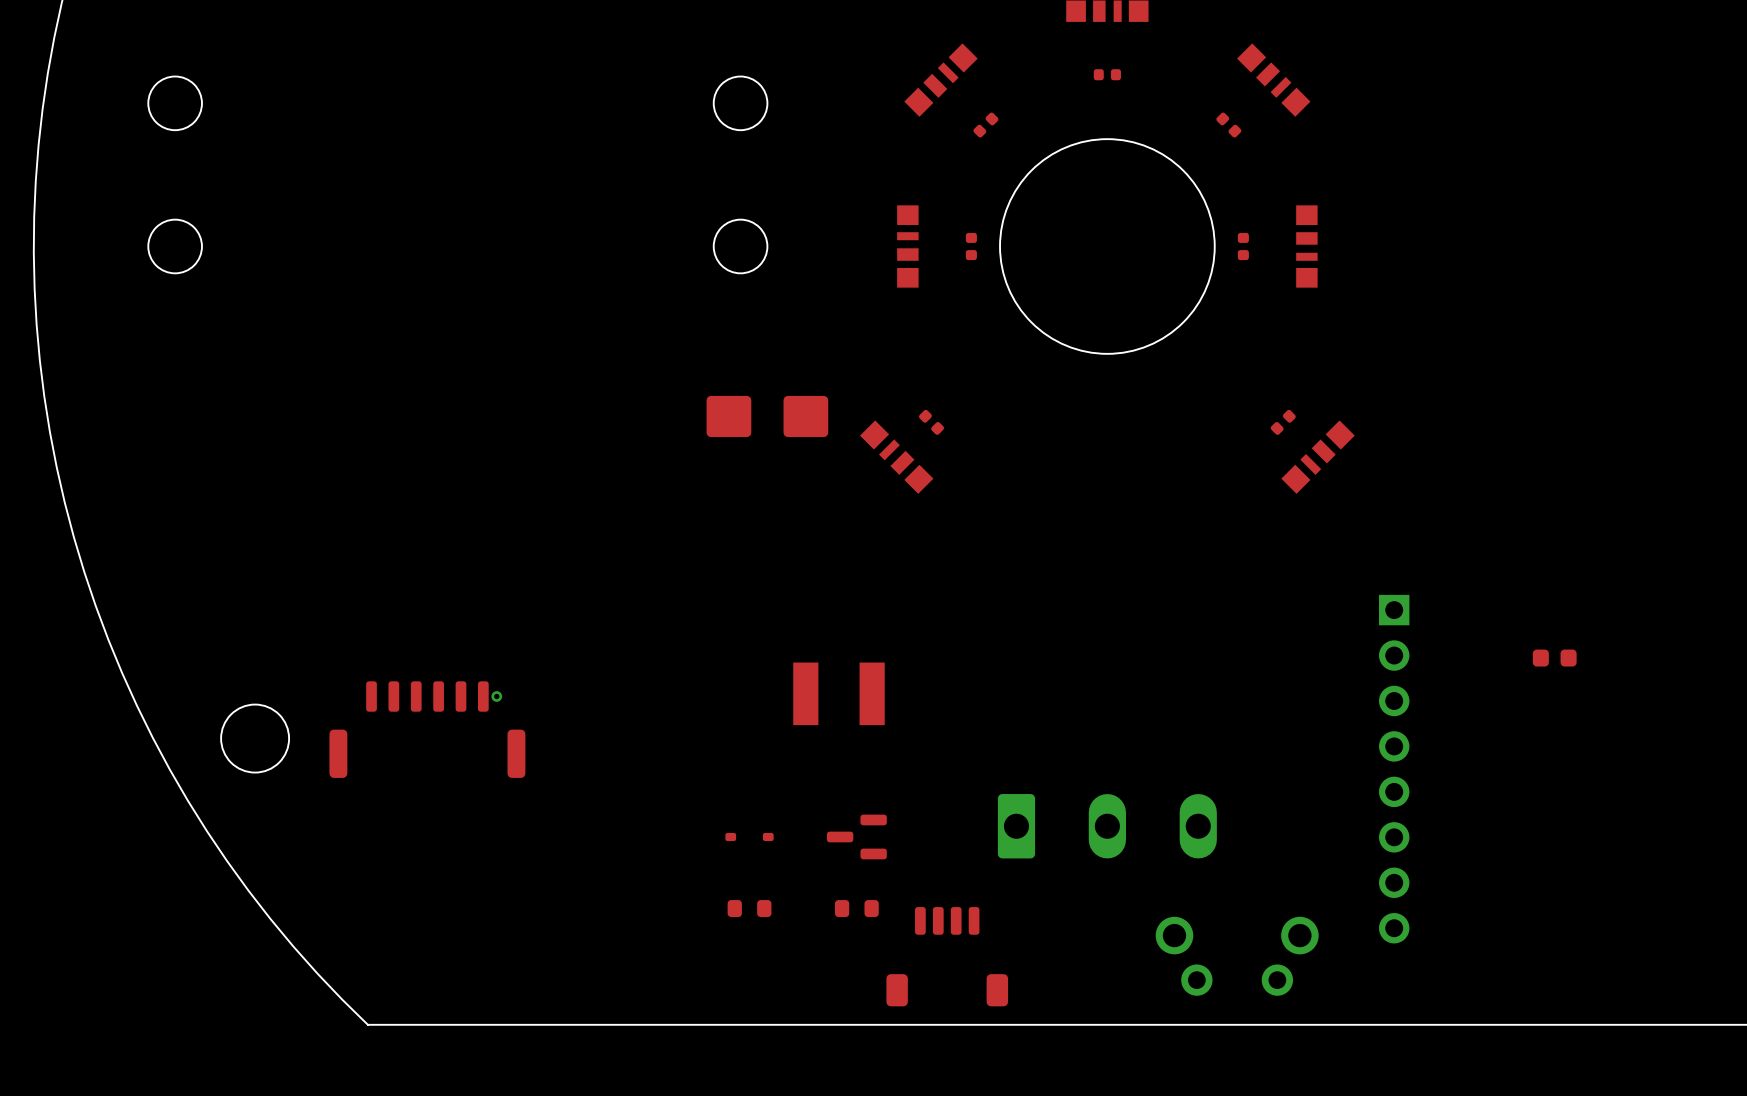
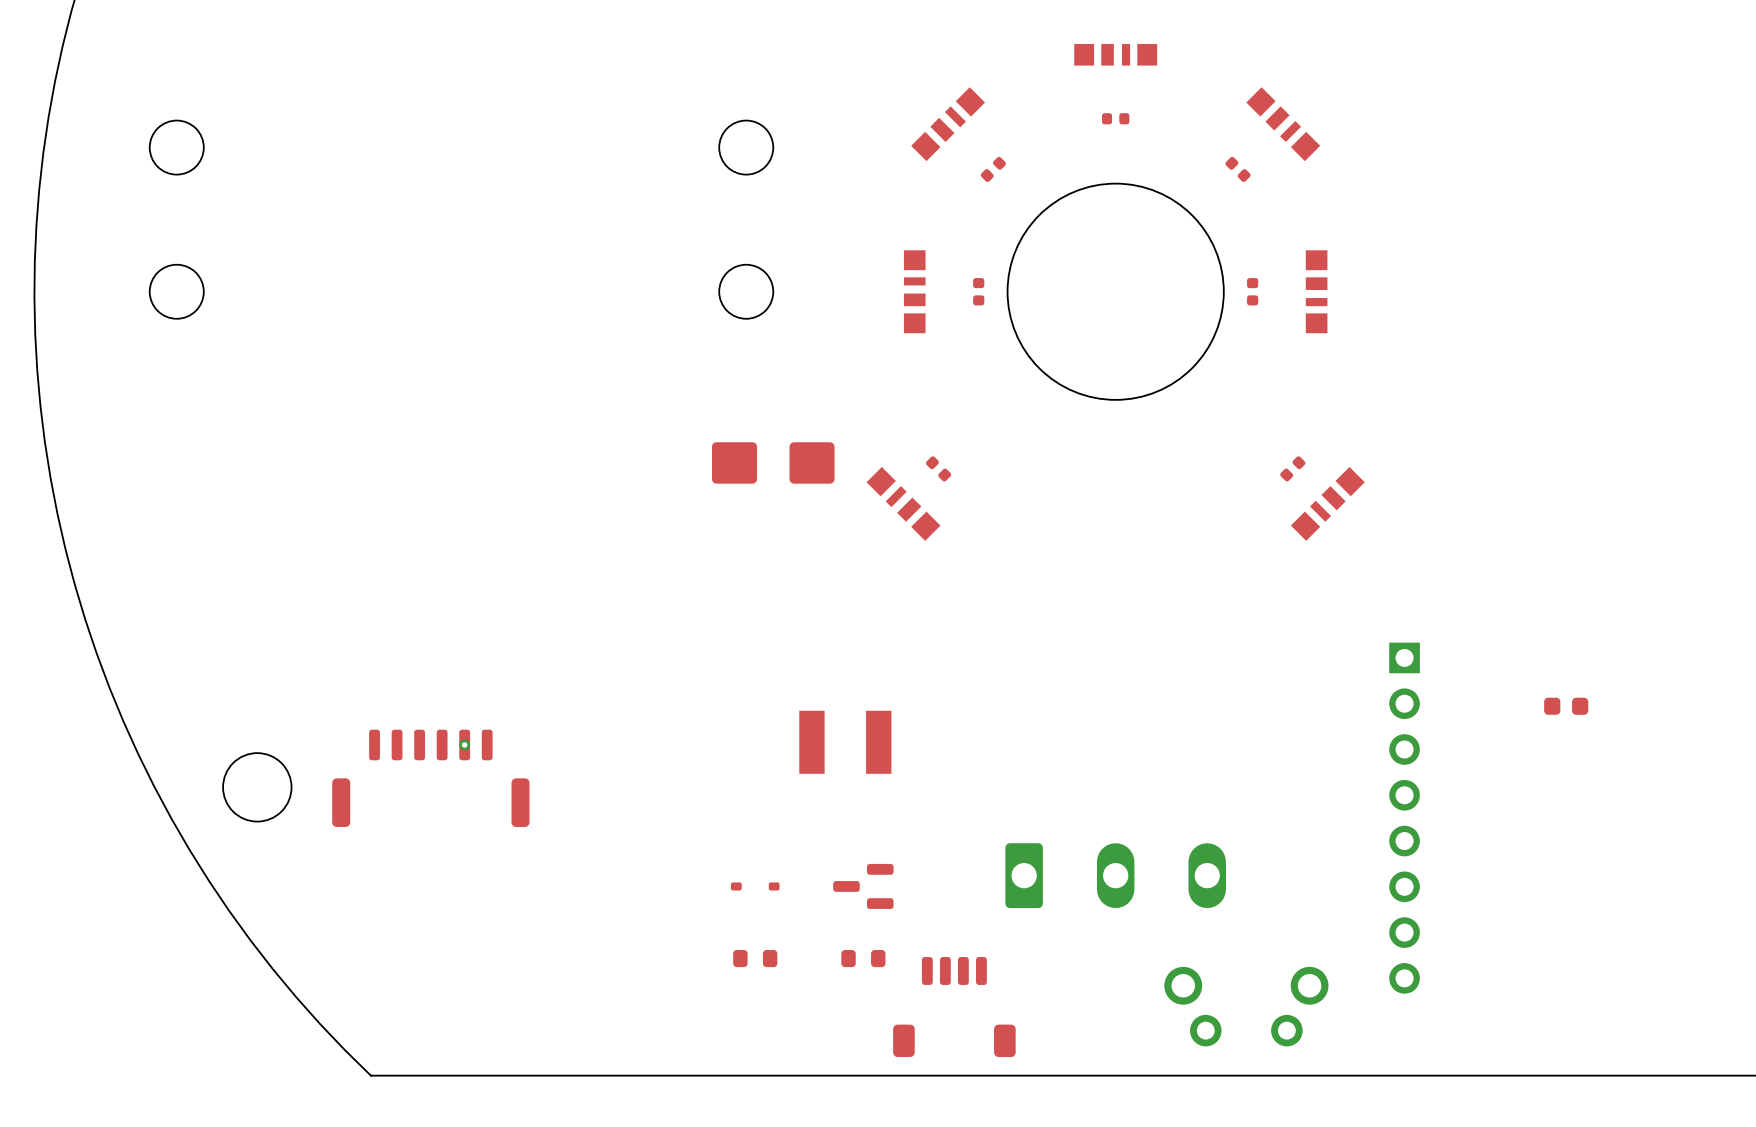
via position: (496, 696) -> (464, 744)

